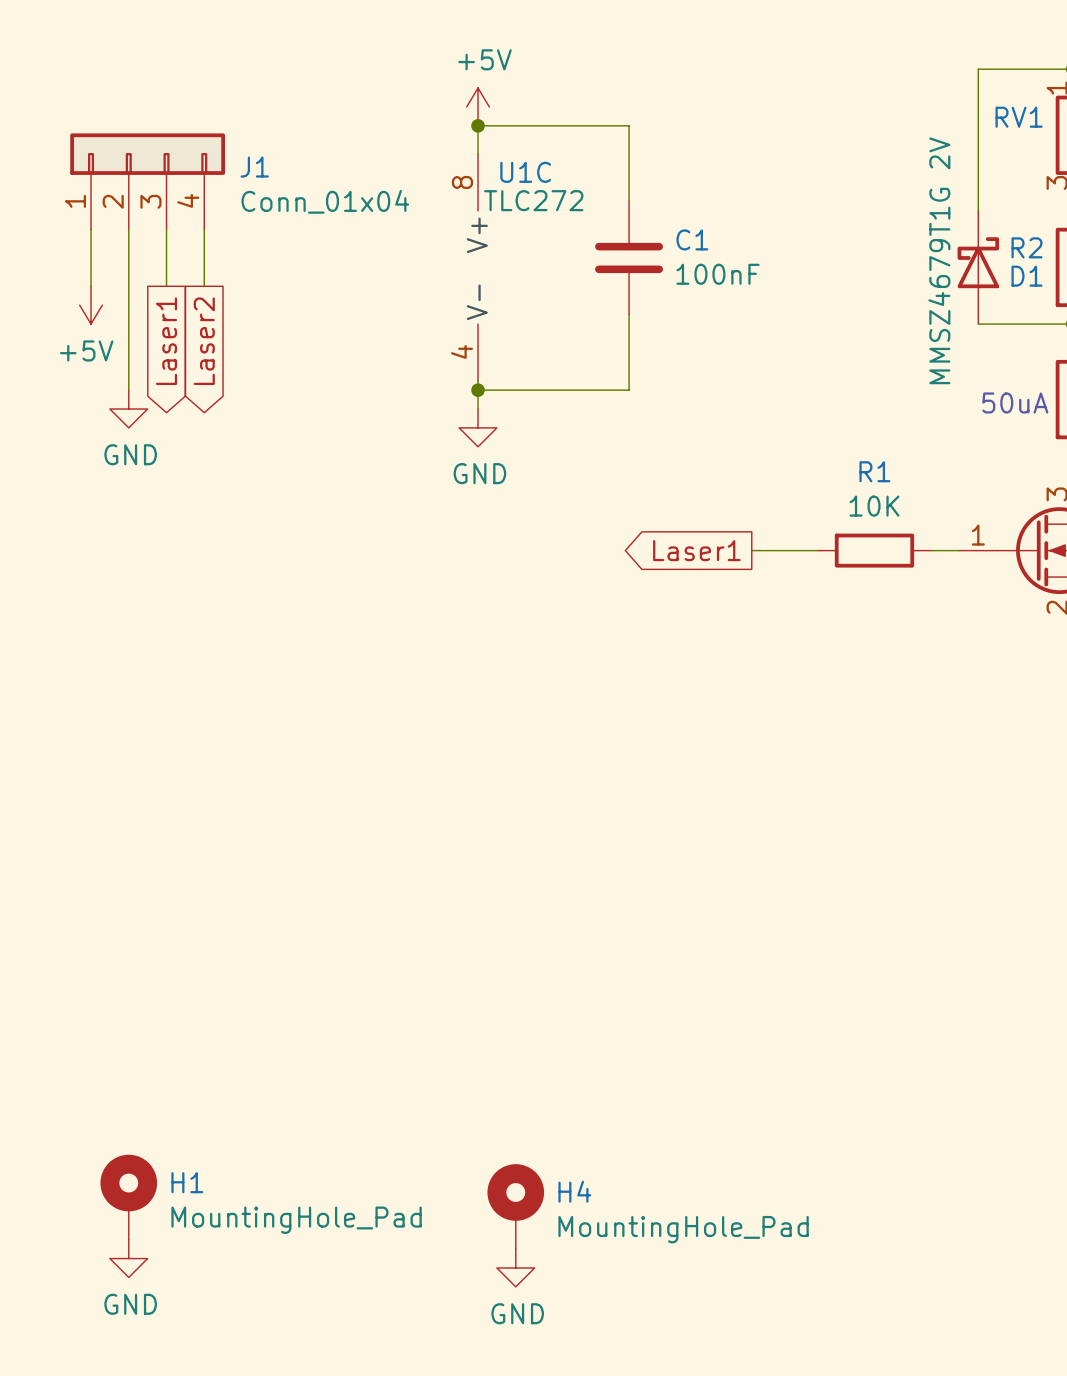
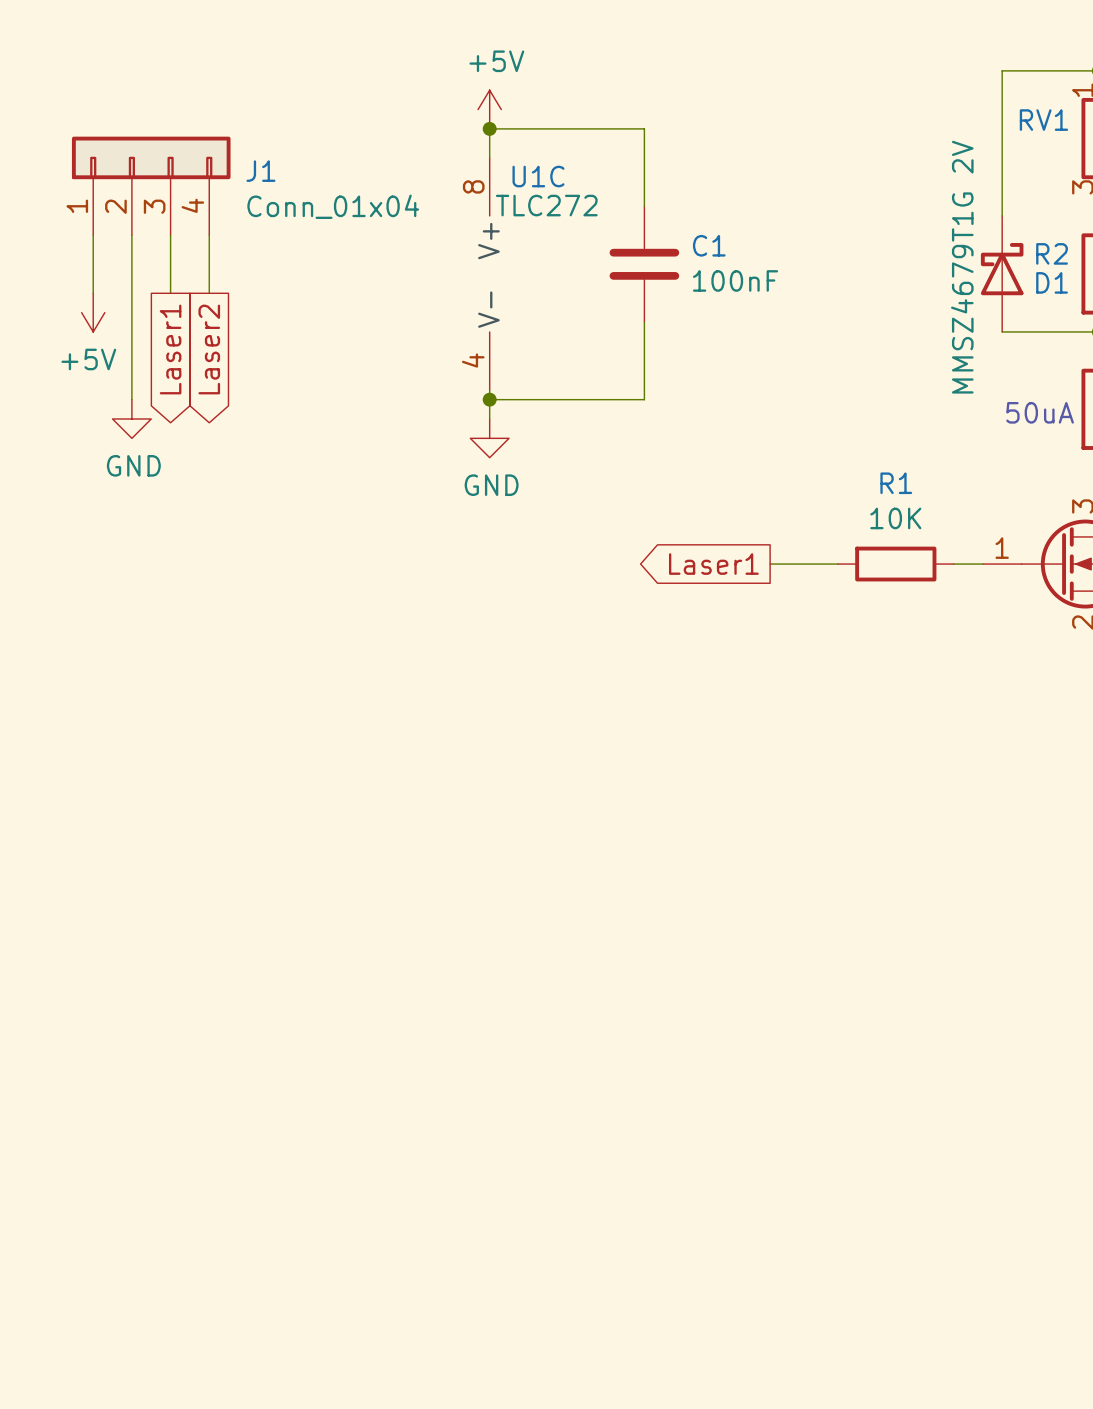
H1: MountingHole_Pad (128, 1197) -> none
H4: MountingHole_Pad (515, 1206) -> none
power symbol: GND (128, 1258) -> none
power symbol: GND (515, 1268) -> none

